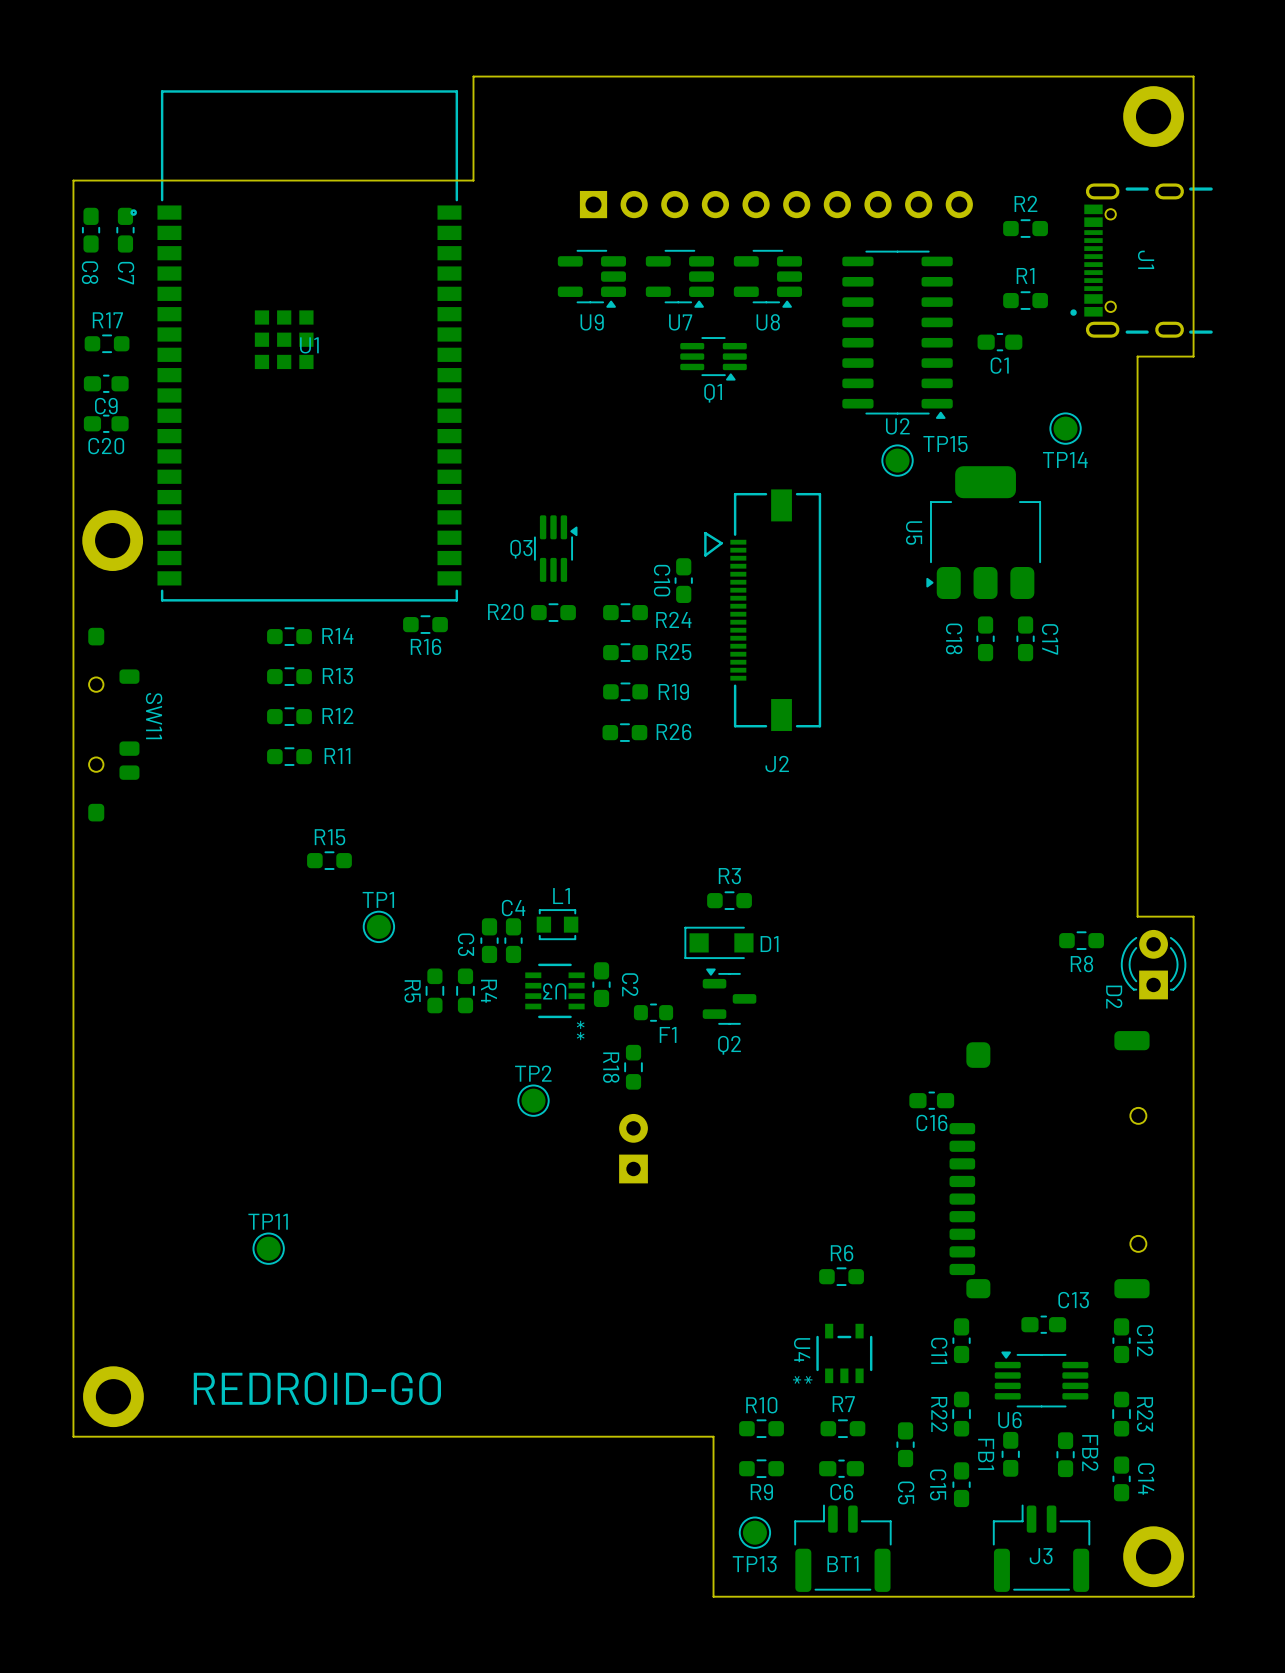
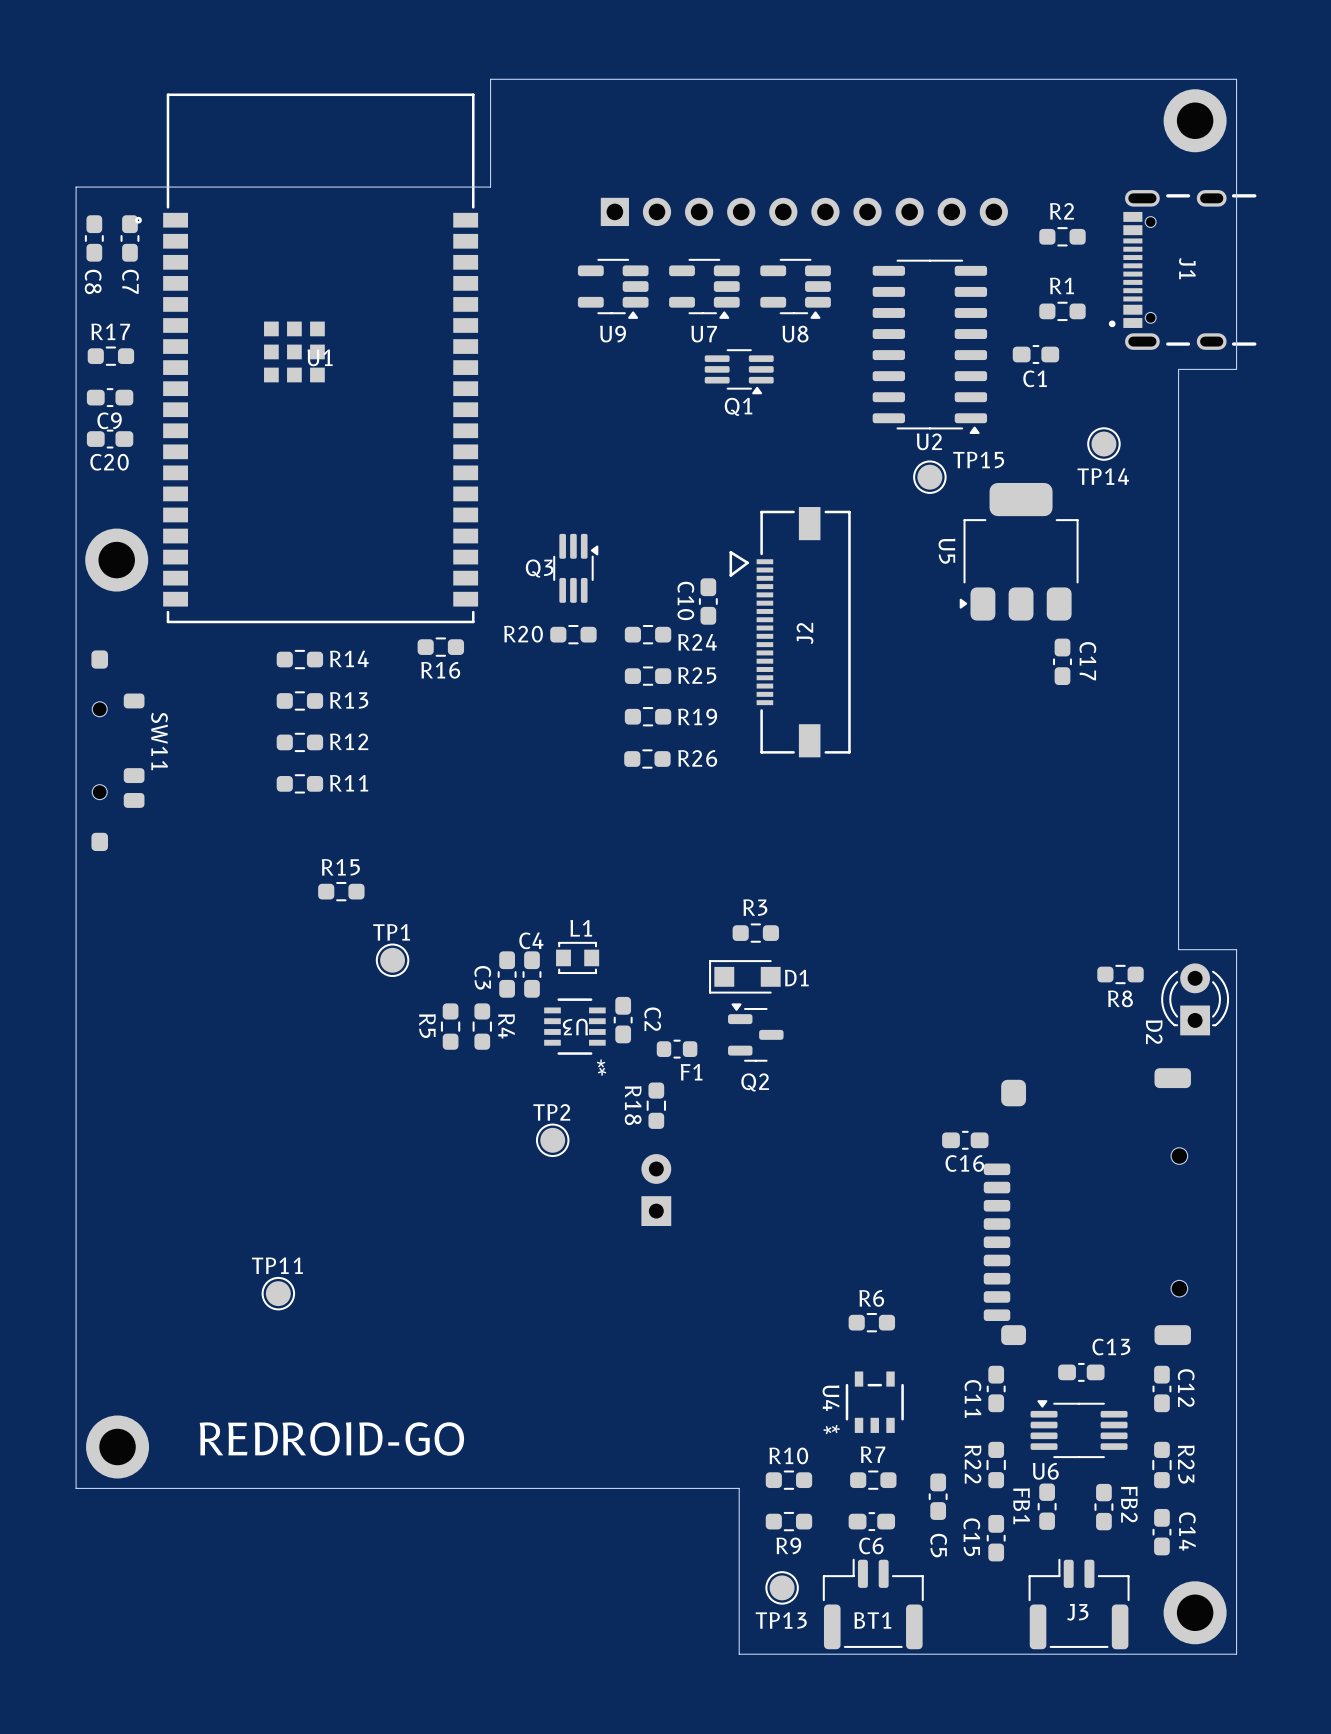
C18: (985, 638) -> none
J2 name rotation: 0° (777, 764) -> 90° counterclockwise (805, 633)
J2 name position: J2 (777, 764) -> J2 (805, 633)

